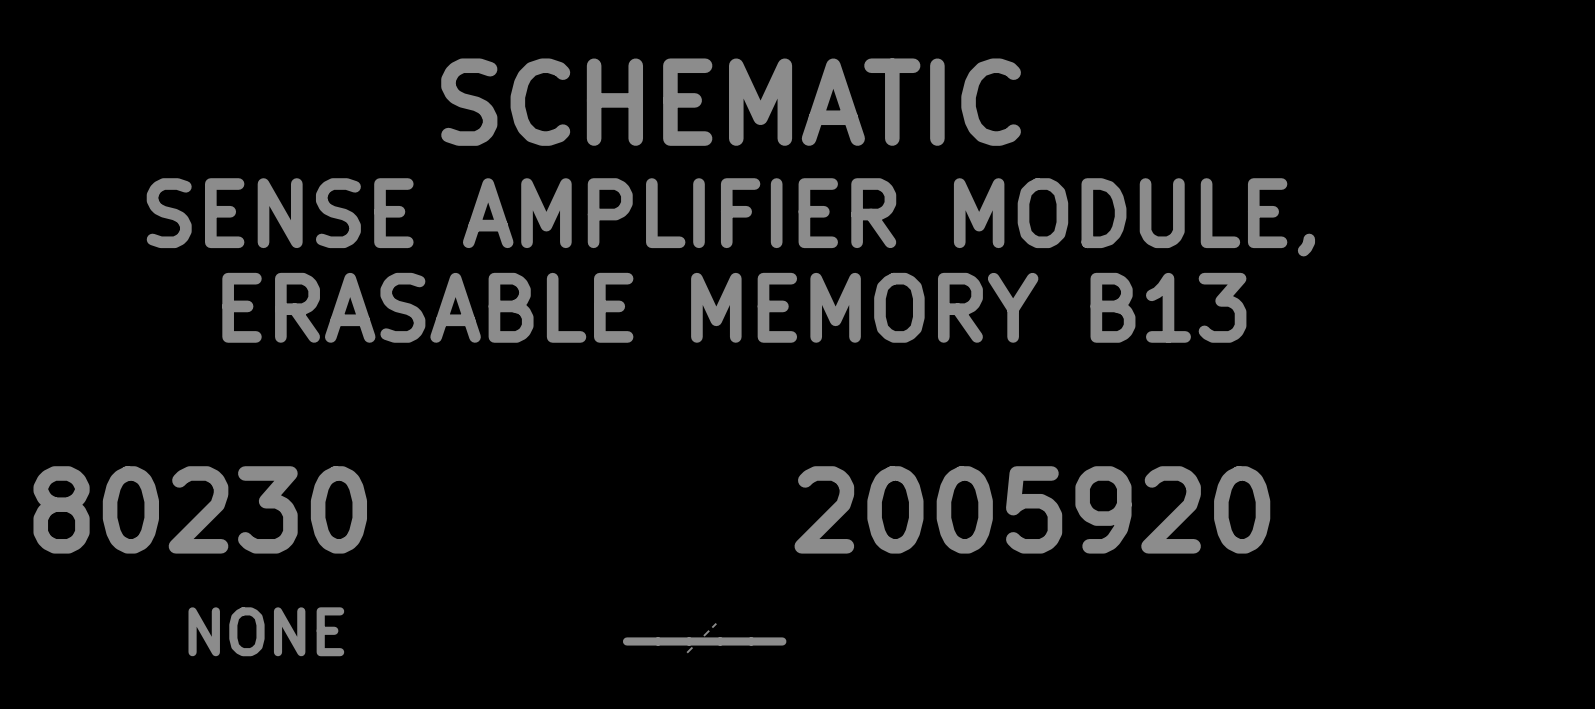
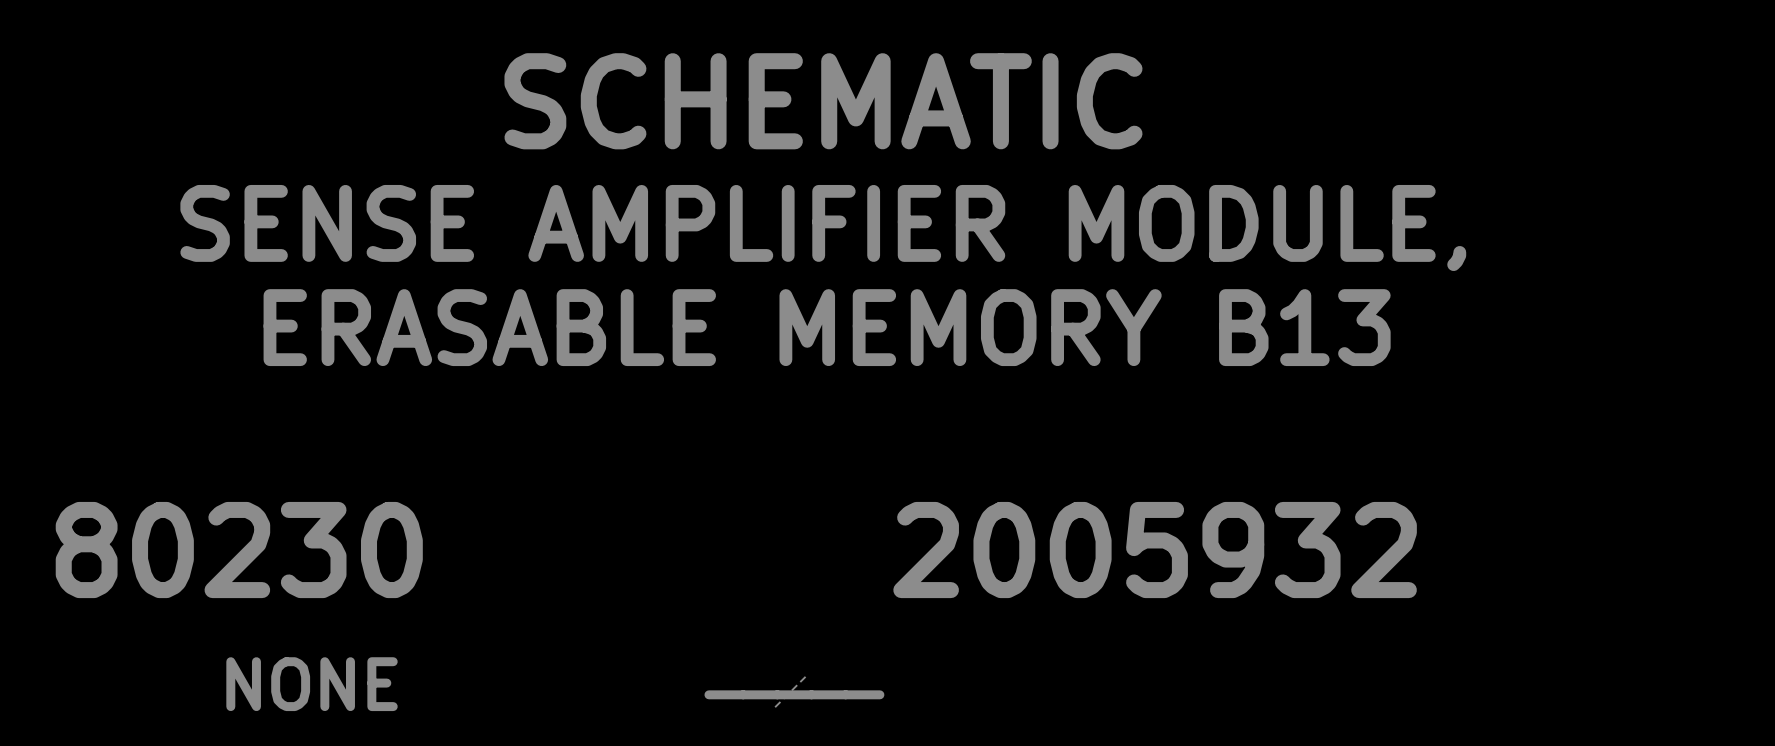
text: 2005920 (1032, 509) -> 2005932 (1155, 550)

